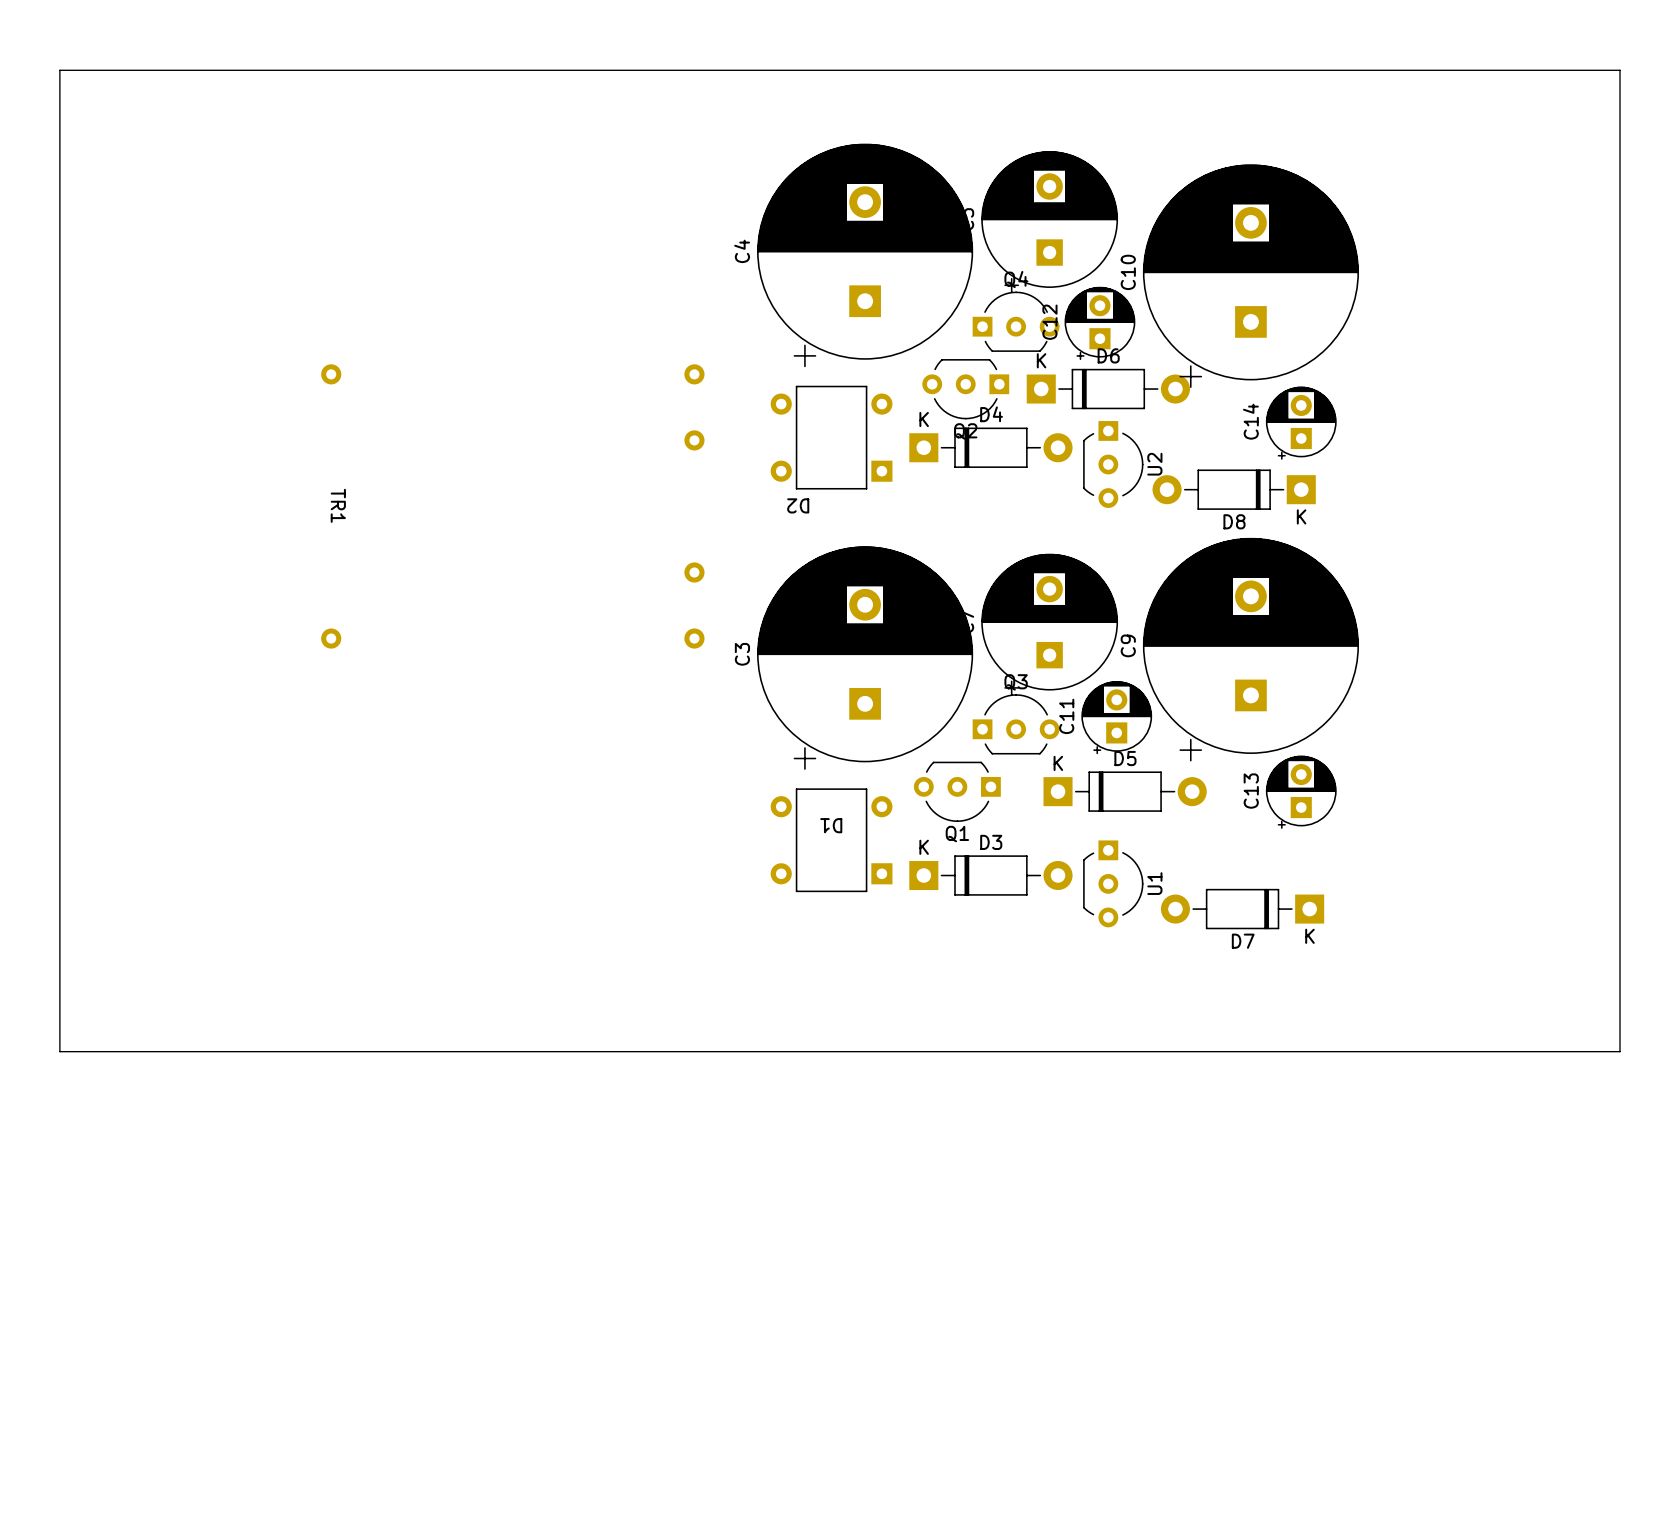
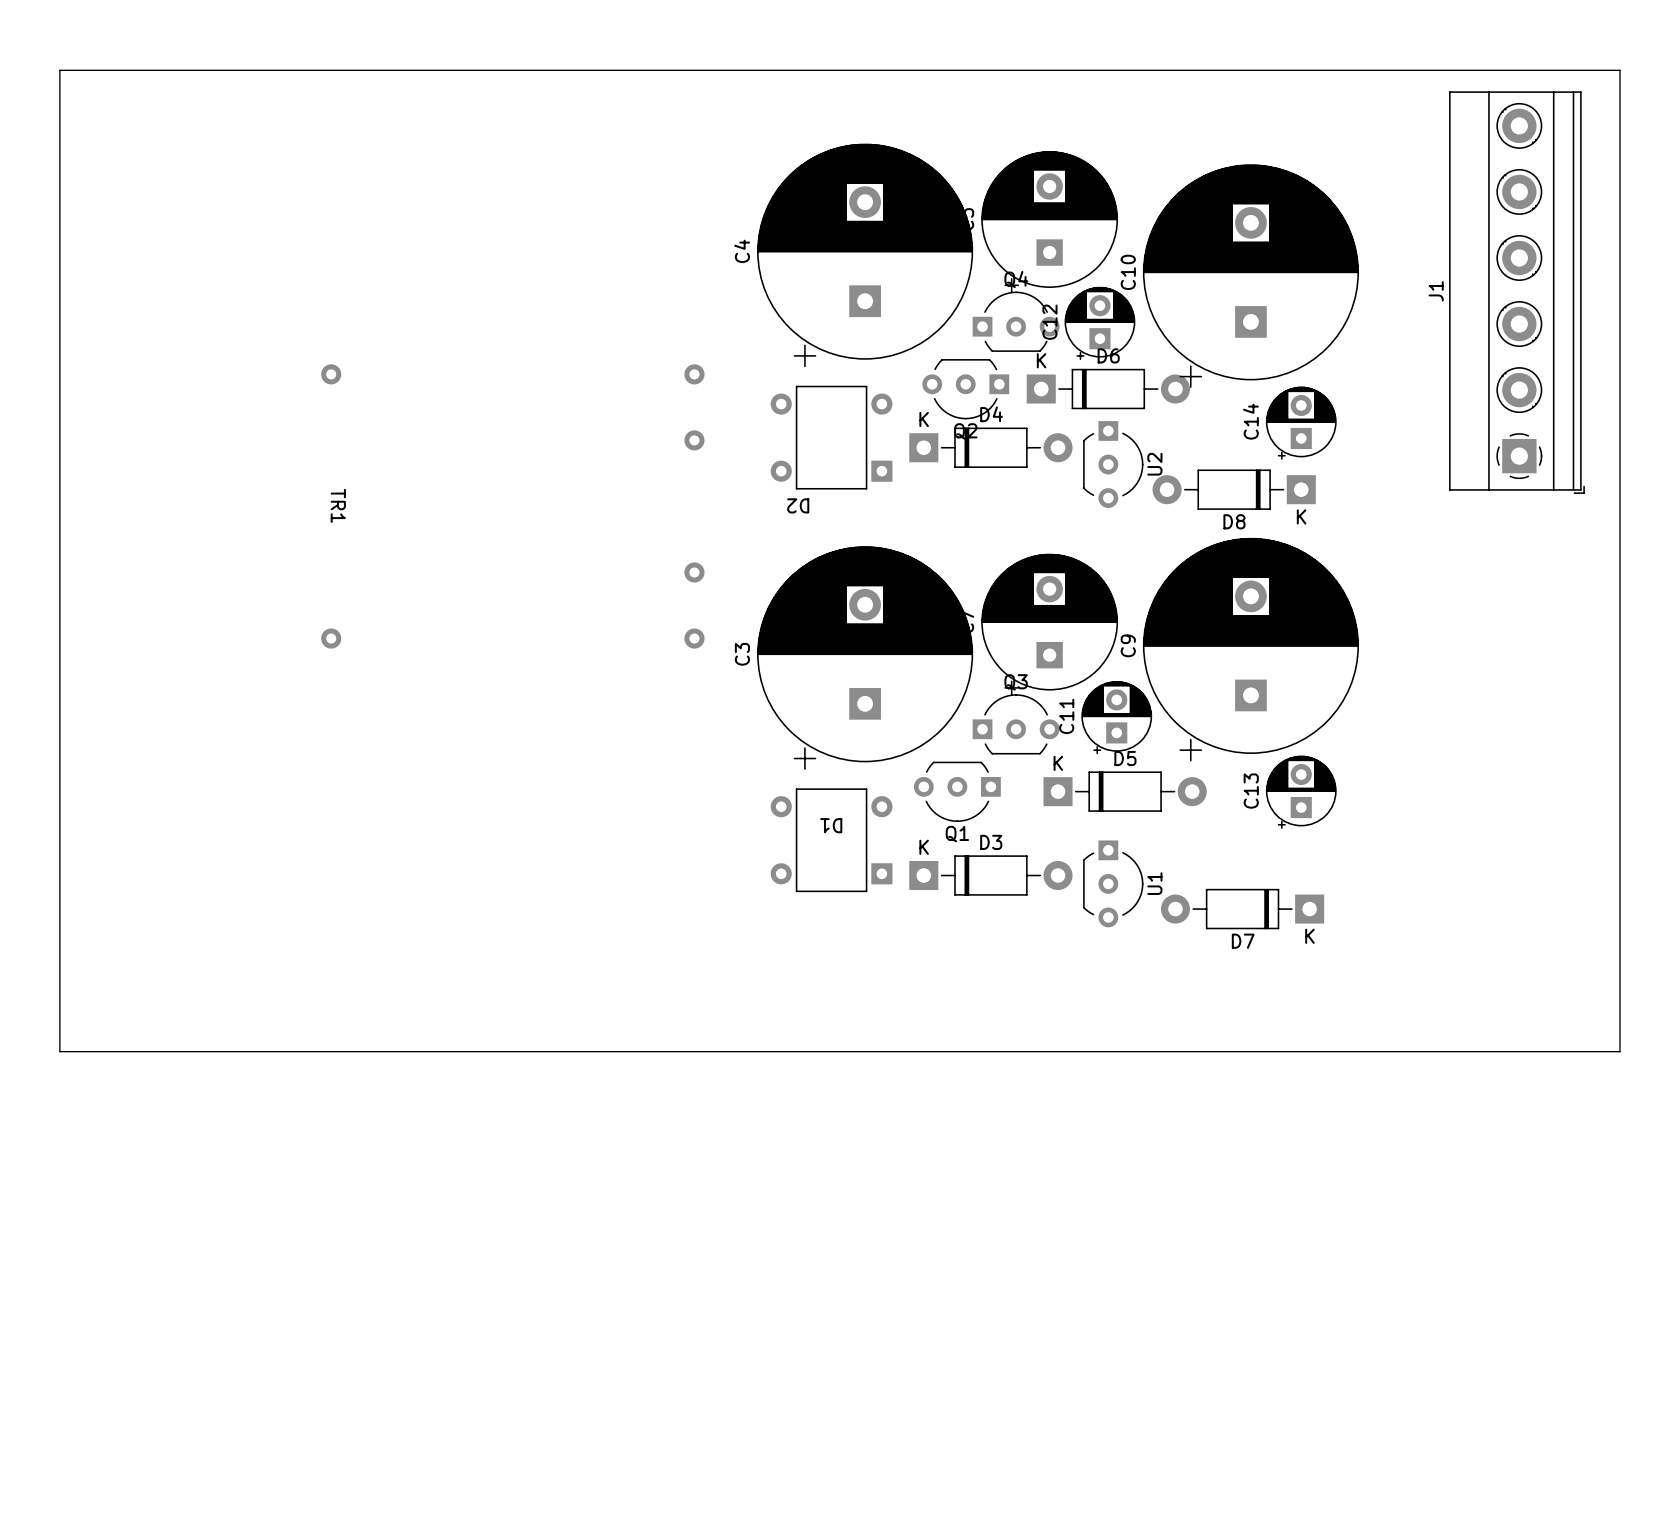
J1: none -> (1516, 292)

